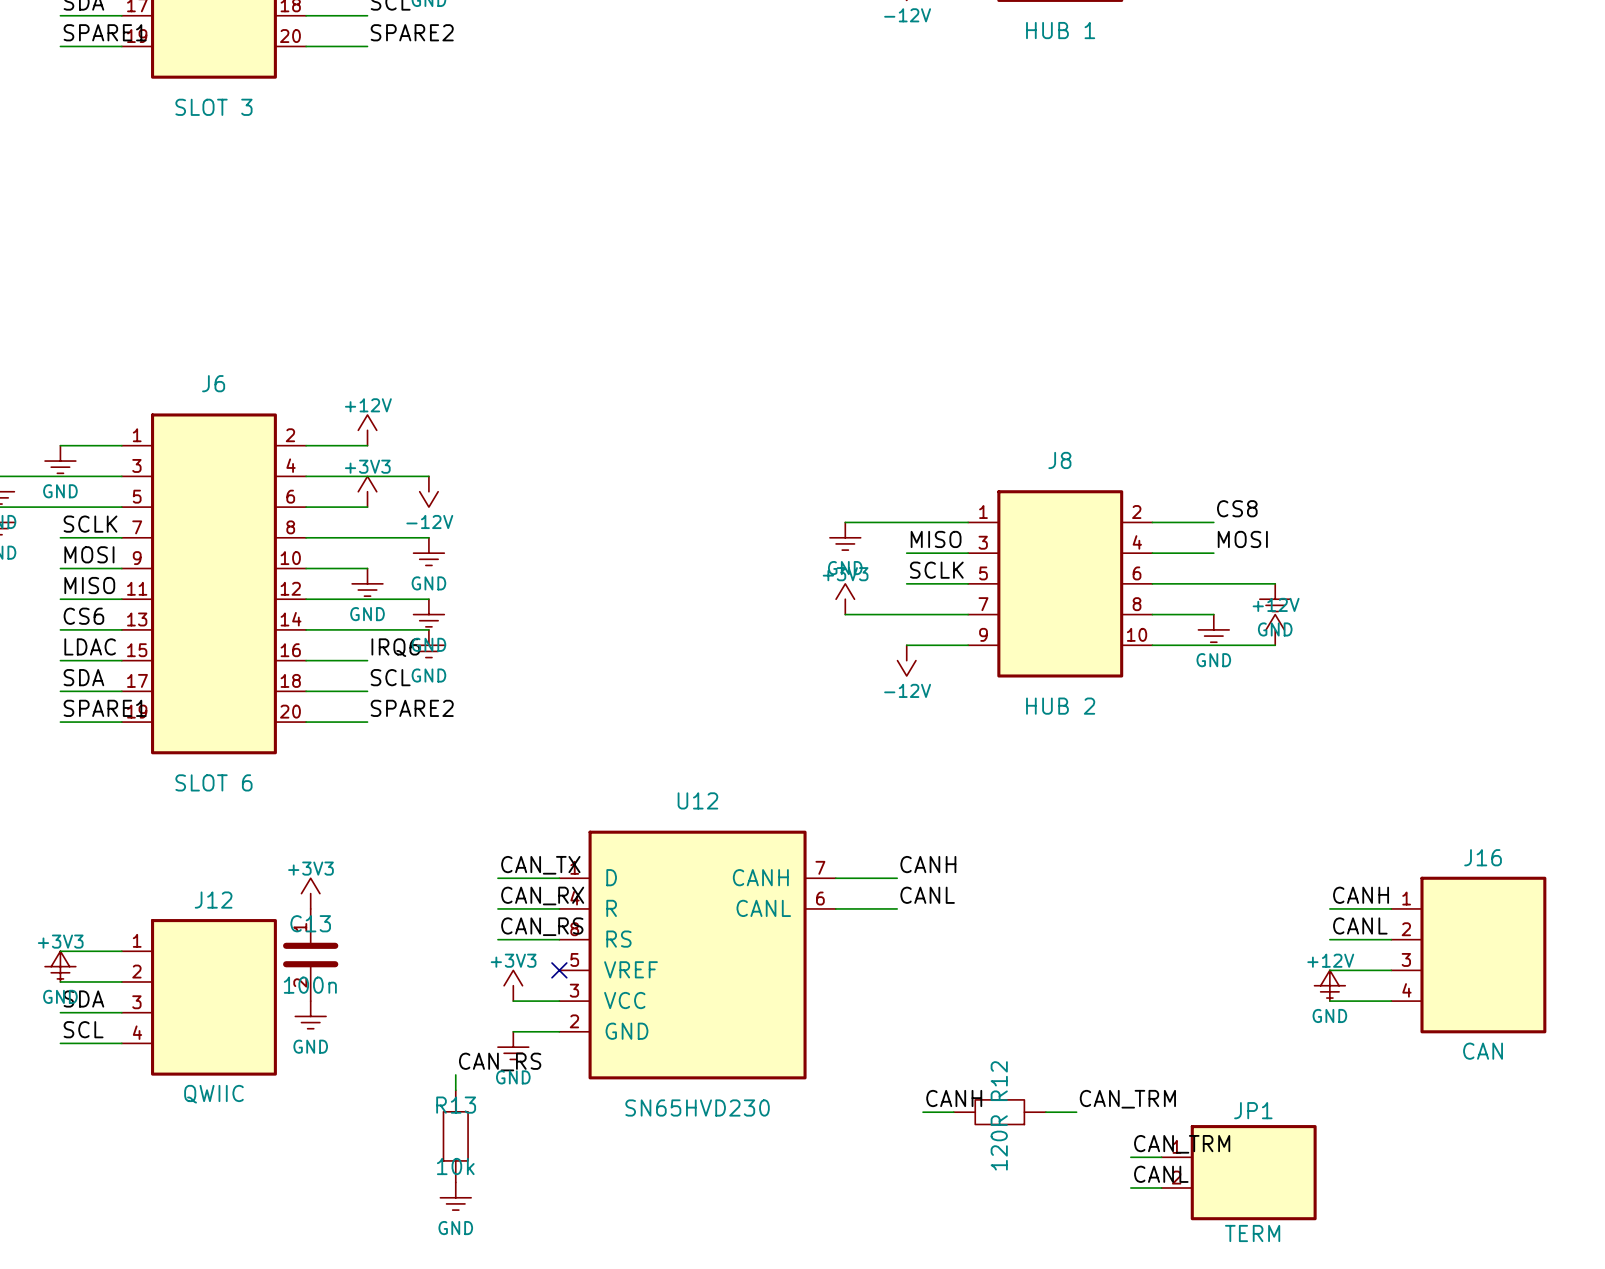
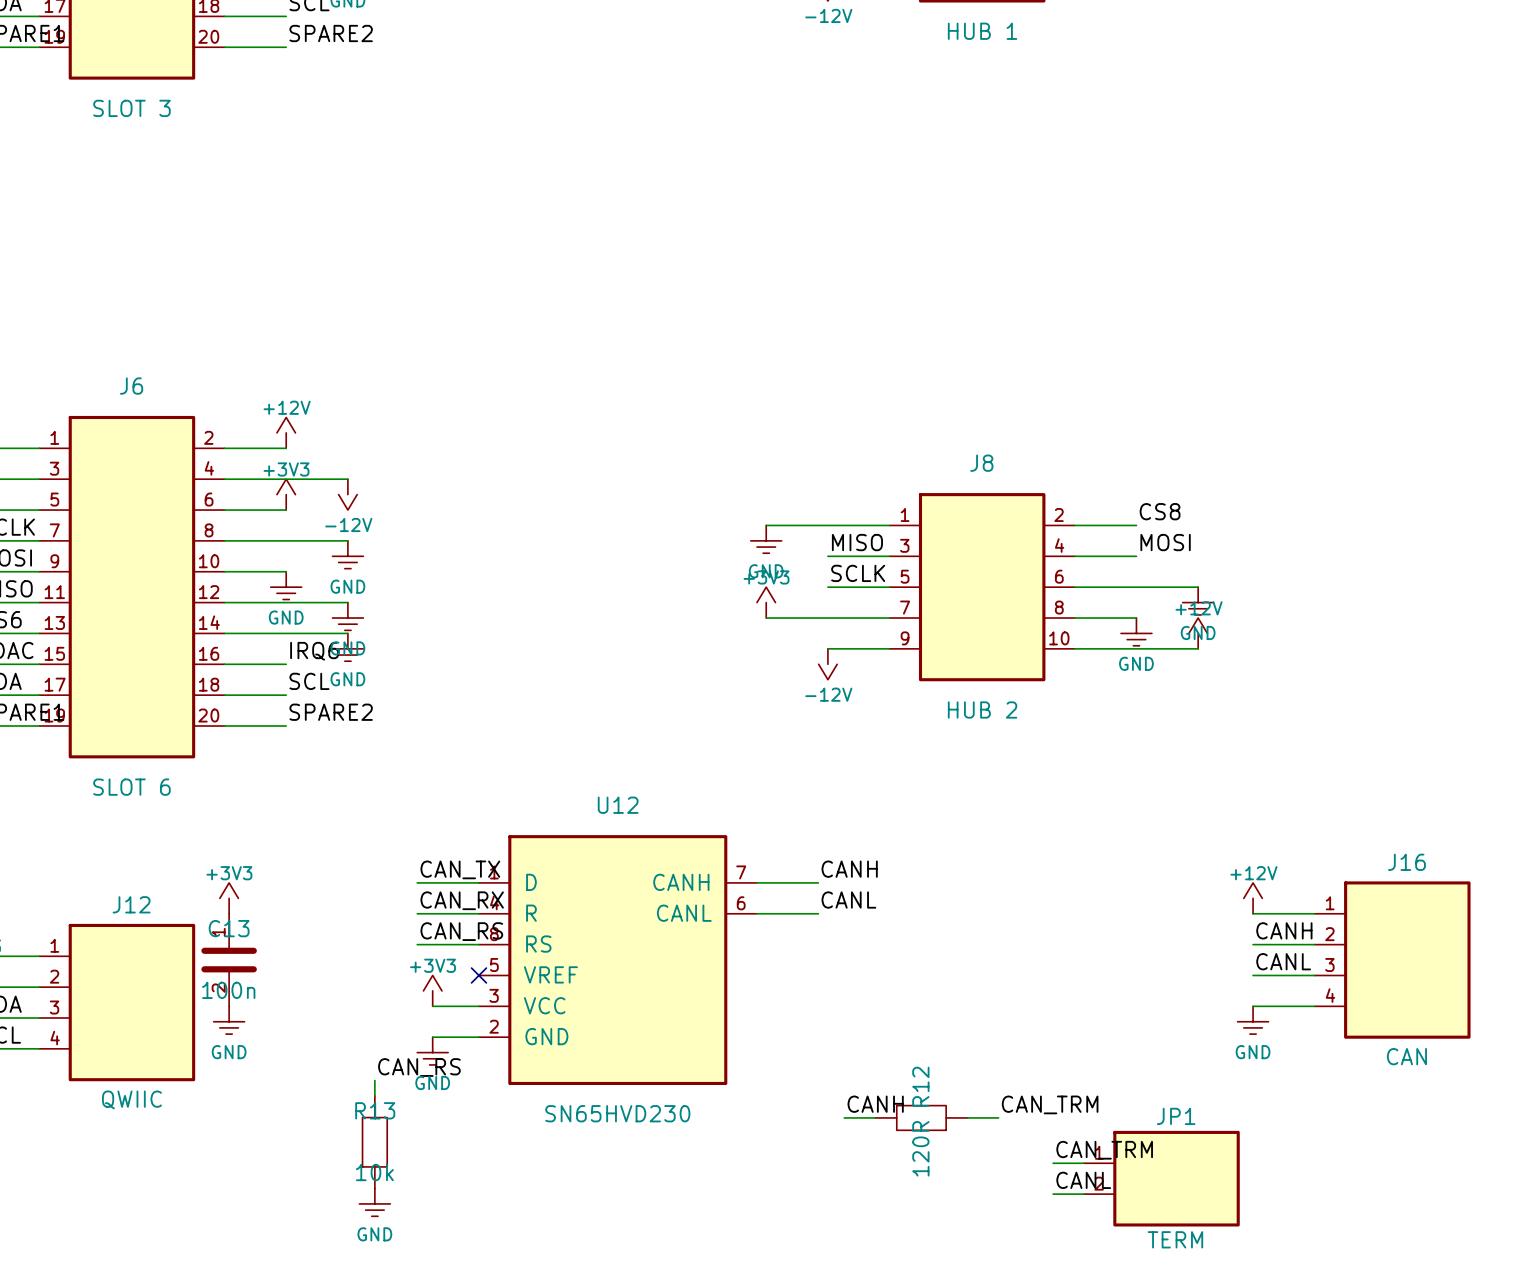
label: CANH (1361, 895) -> none
label: CANL (1360, 925) -> CANH (1284, 930)
label: none -> CANL (1283, 961)
power symbol position: GND (1329, 984) -> GND (1253, 1020)
power symbol position: +12V (1329, 985) -> +12V (1253, 898)

